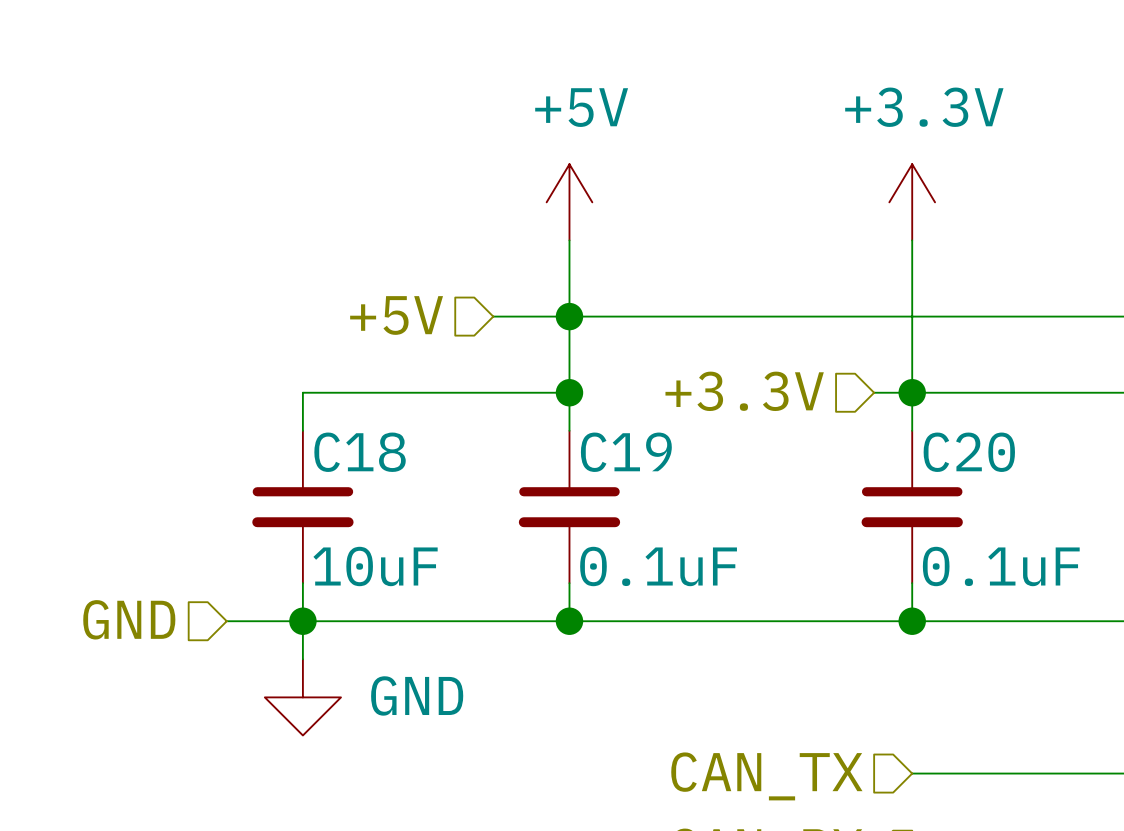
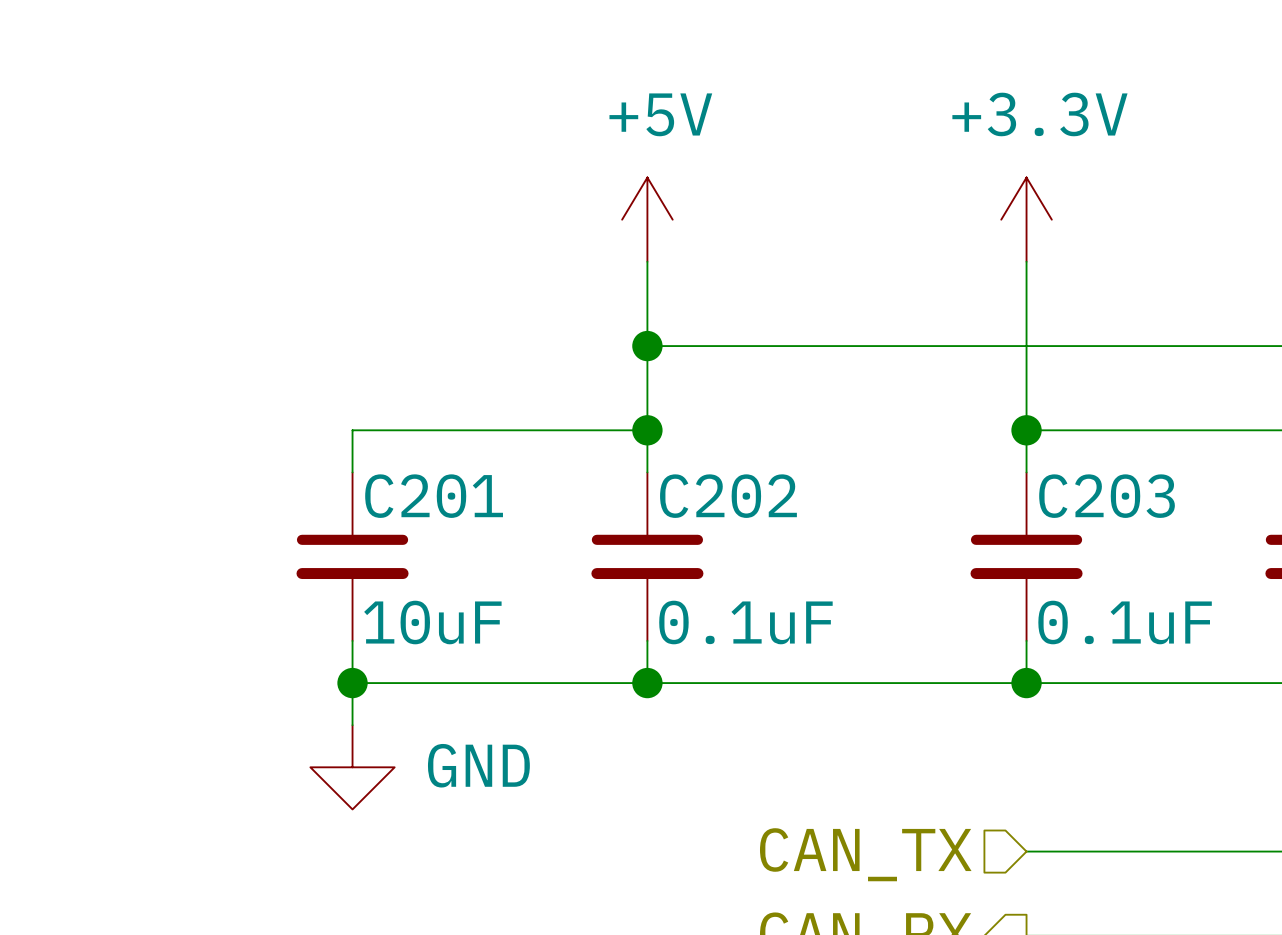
hierarchical label: +5V (396, 315) -> none
wire: (493, 316) (569, 316) -> none
hierarchical label: +3.3V (744, 391) -> none
wire: (874, 392) (912, 392) -> none
C18 name: C18 (360, 452) -> C201 (434, 496)
C19 name: C19 (626, 452) -> C202 (728, 496)
C20 name: C20 (969, 452) -> C203 (1107, 496)
hierarchical label: GND (129, 619) -> none
wire: (226, 621) (302, 621) -> none

